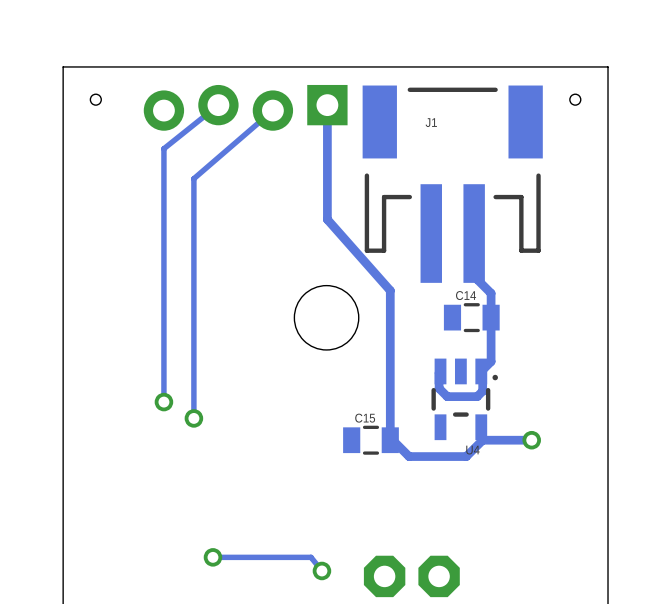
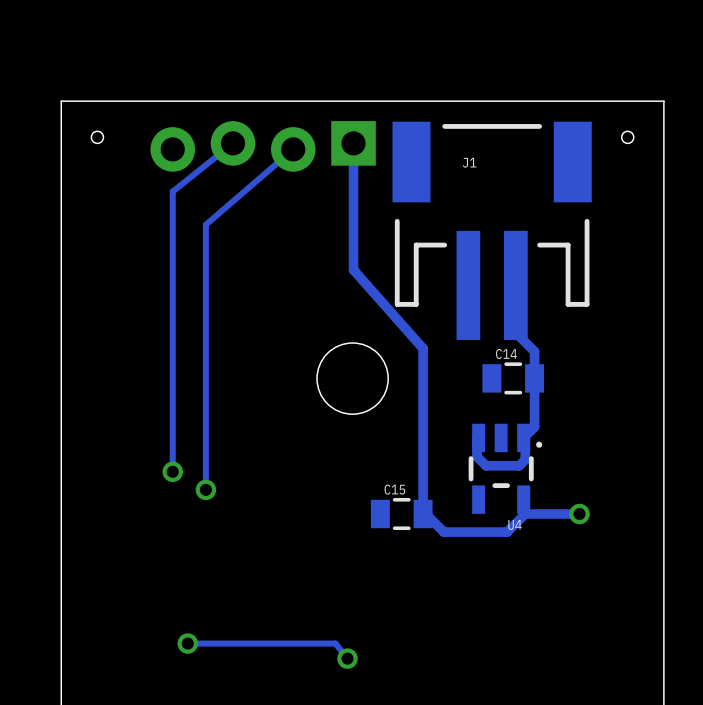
track: none -> (226, 643) (187, 643)
via position: (212, 557) -> (187, 643)
part: (411, 576) -> none

